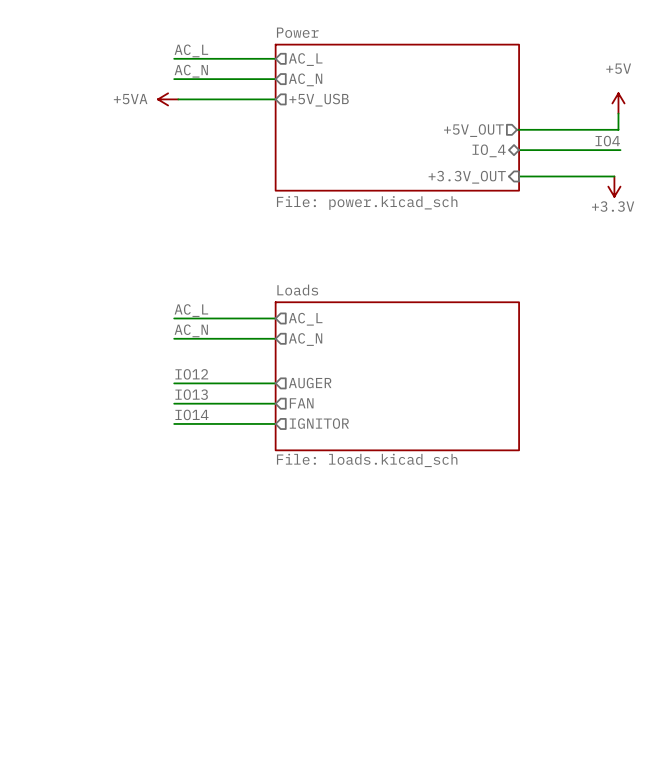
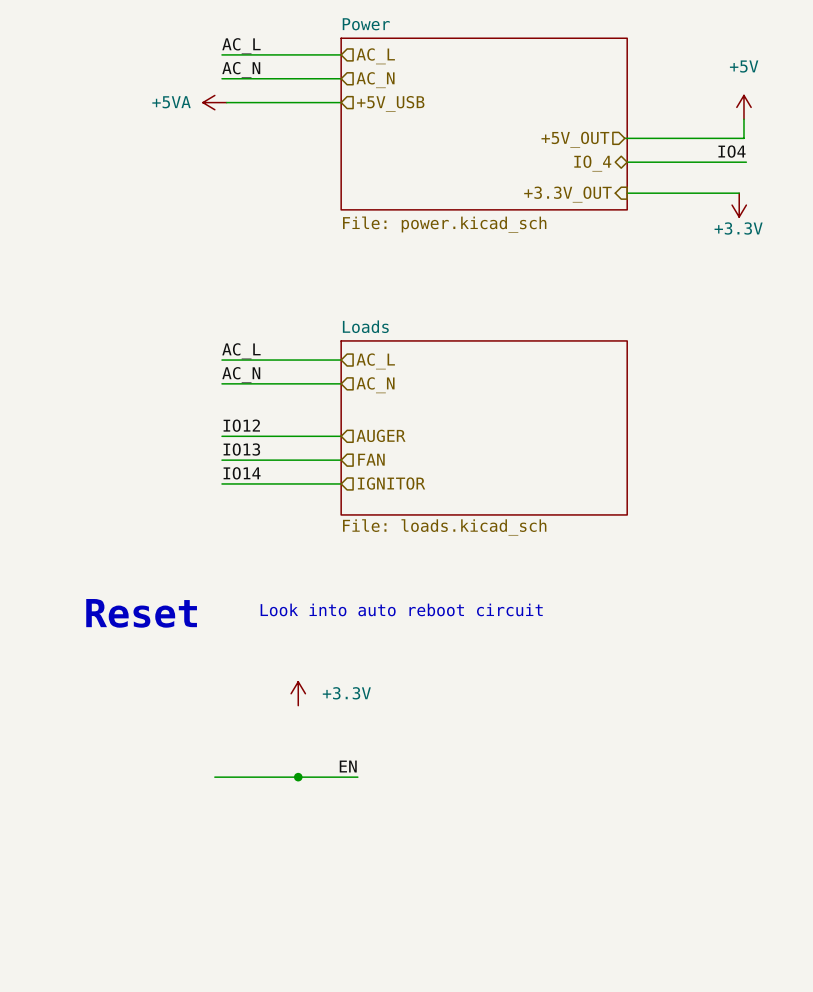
text: none -> Look into auto reboot circuit (401, 609)
text: none -> Reset (141, 613)
power symbol: none -> +3.3V (298, 693)
label: none -> EN (348, 766)
wire: none -> (214, 777) (357, 777)
junction: none -> (298, 777)

